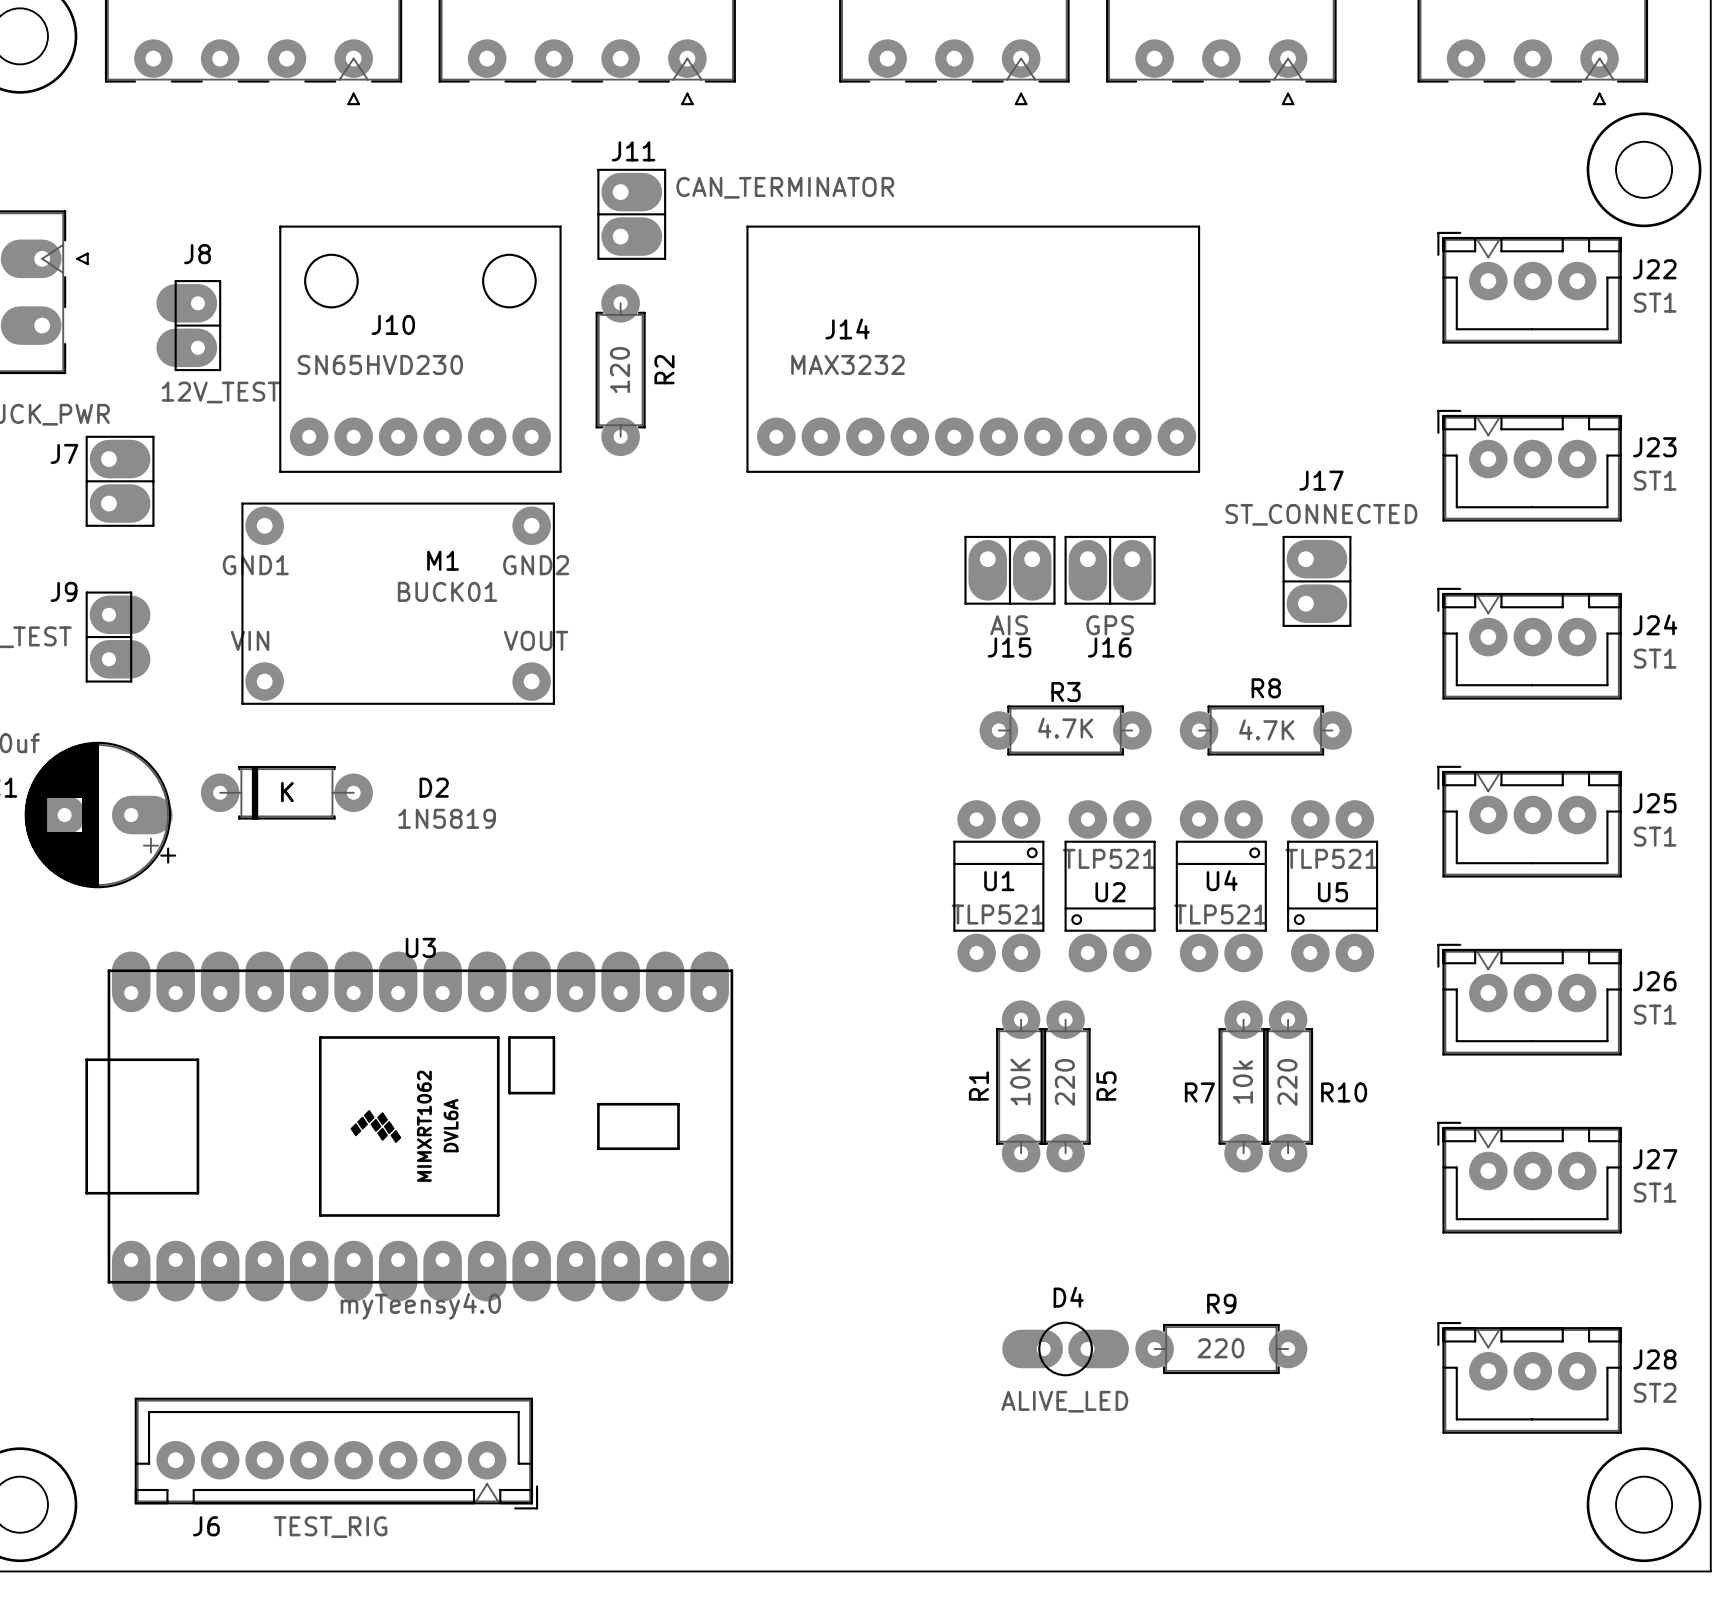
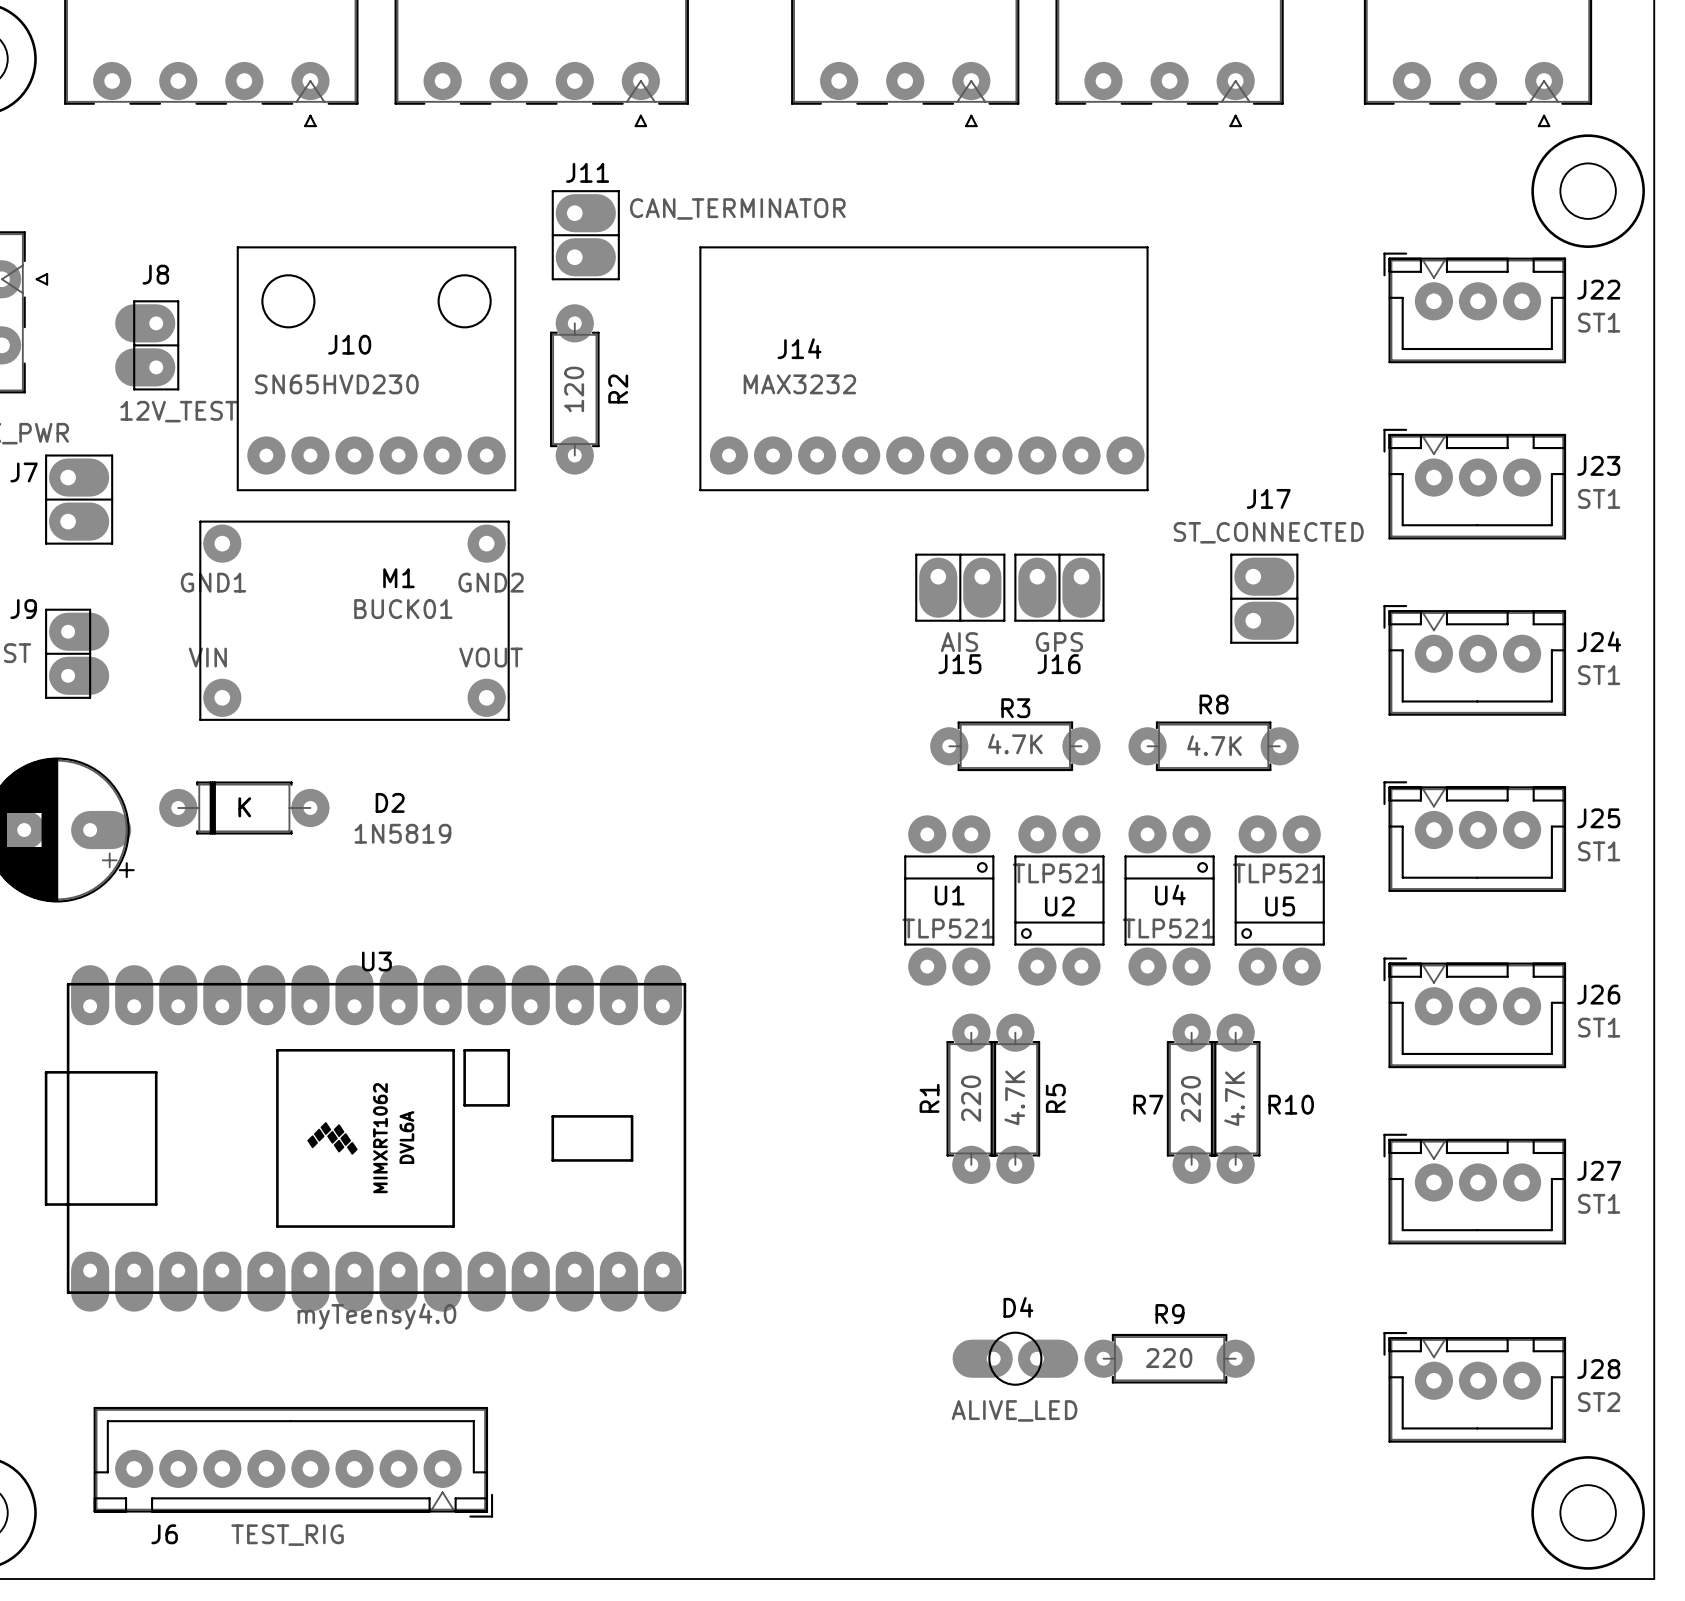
R1 value: 10K (1020, 1082) -> 4.7K (1014, 1097)
R5 value position: 220 (1064, 1082) -> 220 (971, 1098)
R7 value: 10k (1242, 1082) -> 4.7K (1234, 1098)
R10 value position: 220 (1287, 1082) -> 220 (1190, 1099)

